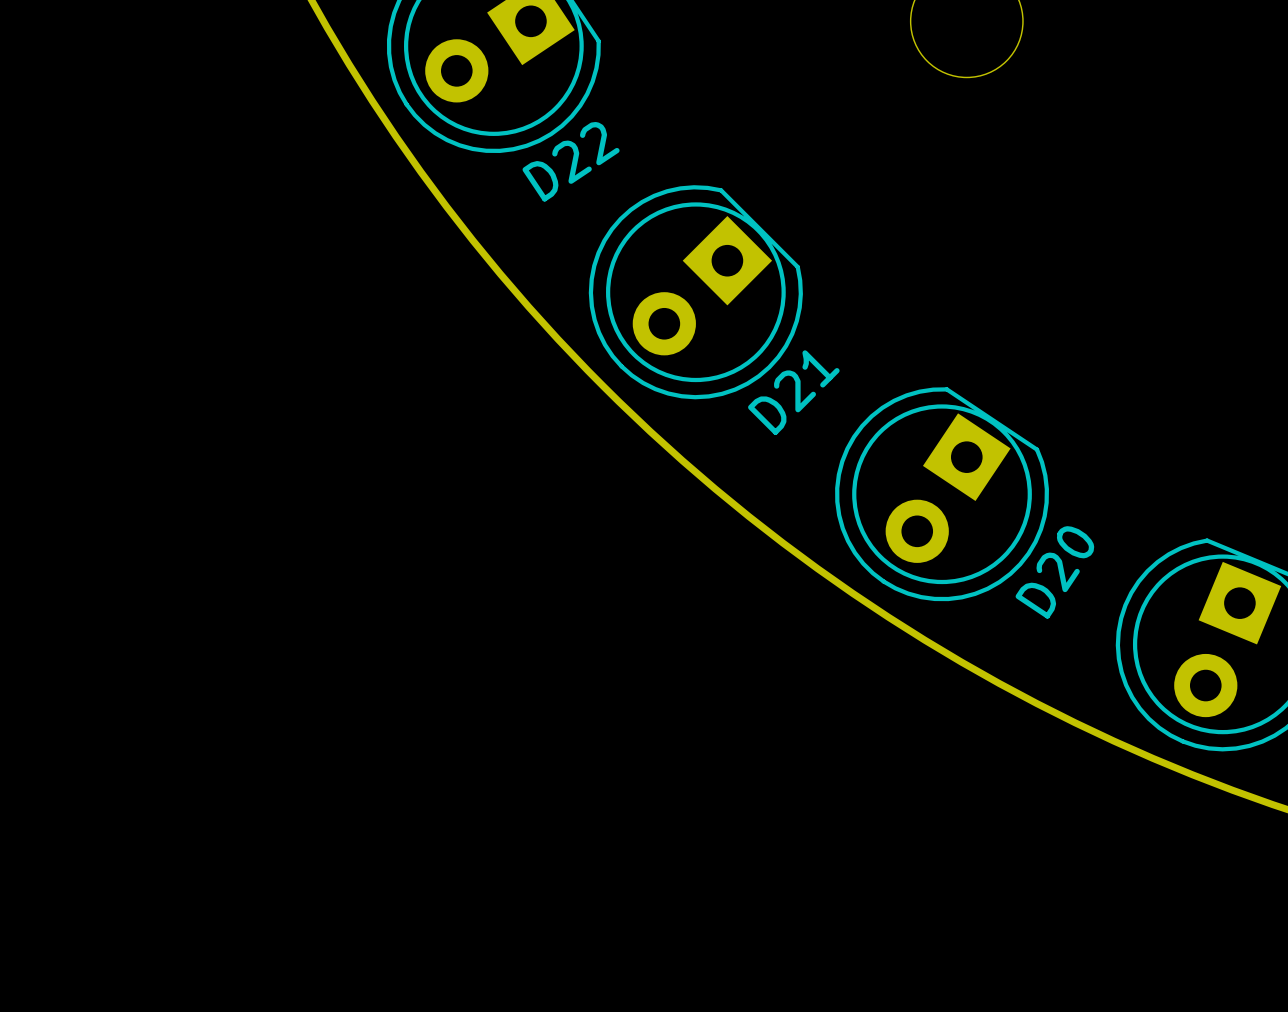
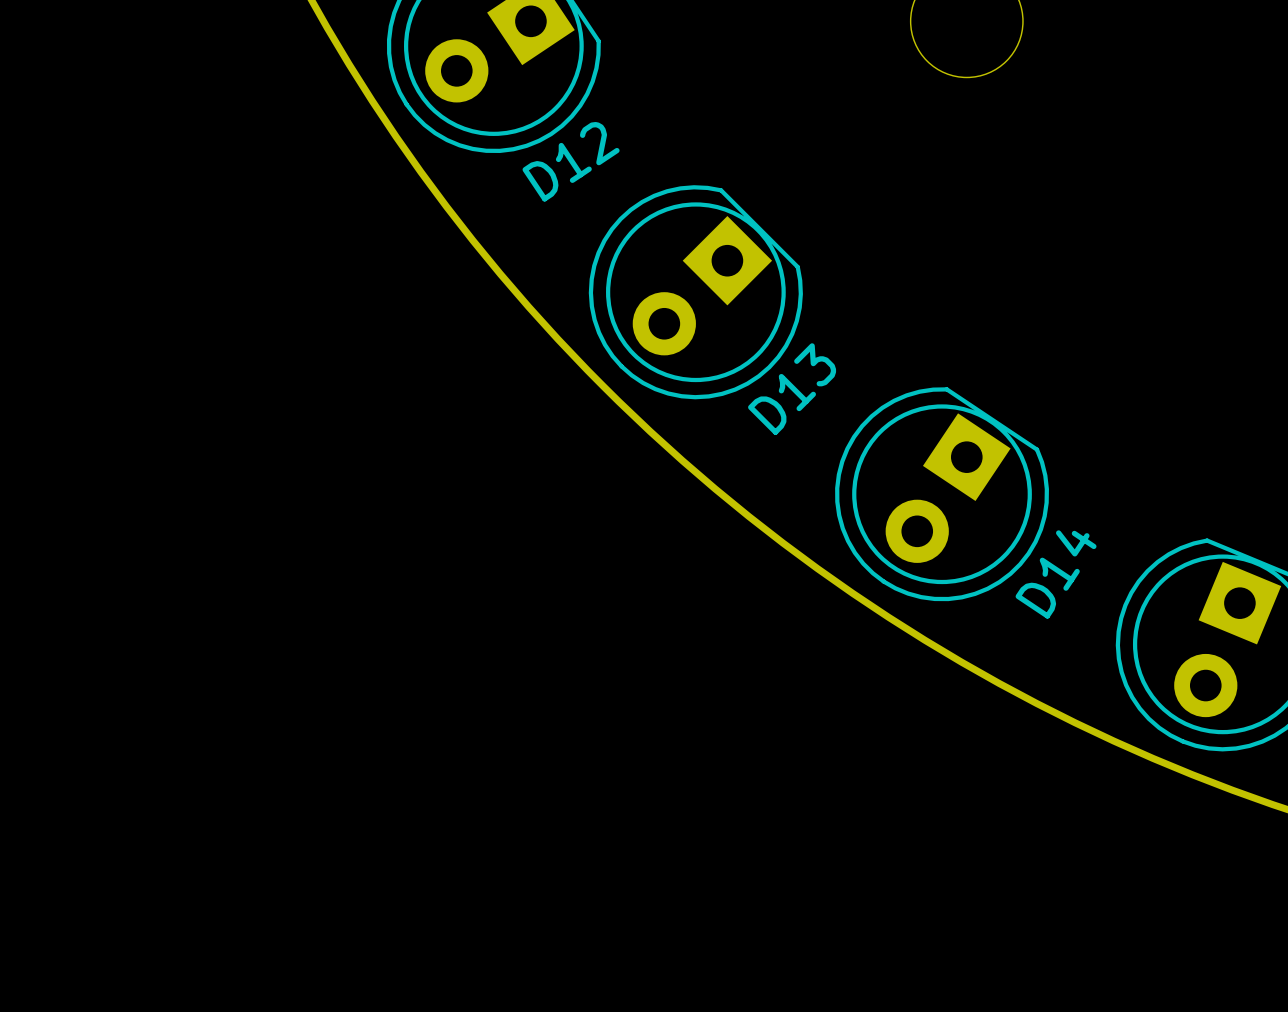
D22 name: D22 (571, 161) -> D12 (571, 161)
D21 name: D21 (793, 392) -> D13 (792, 389)
D20 name: D20 (1054, 572) -> D14 (1056, 574)

